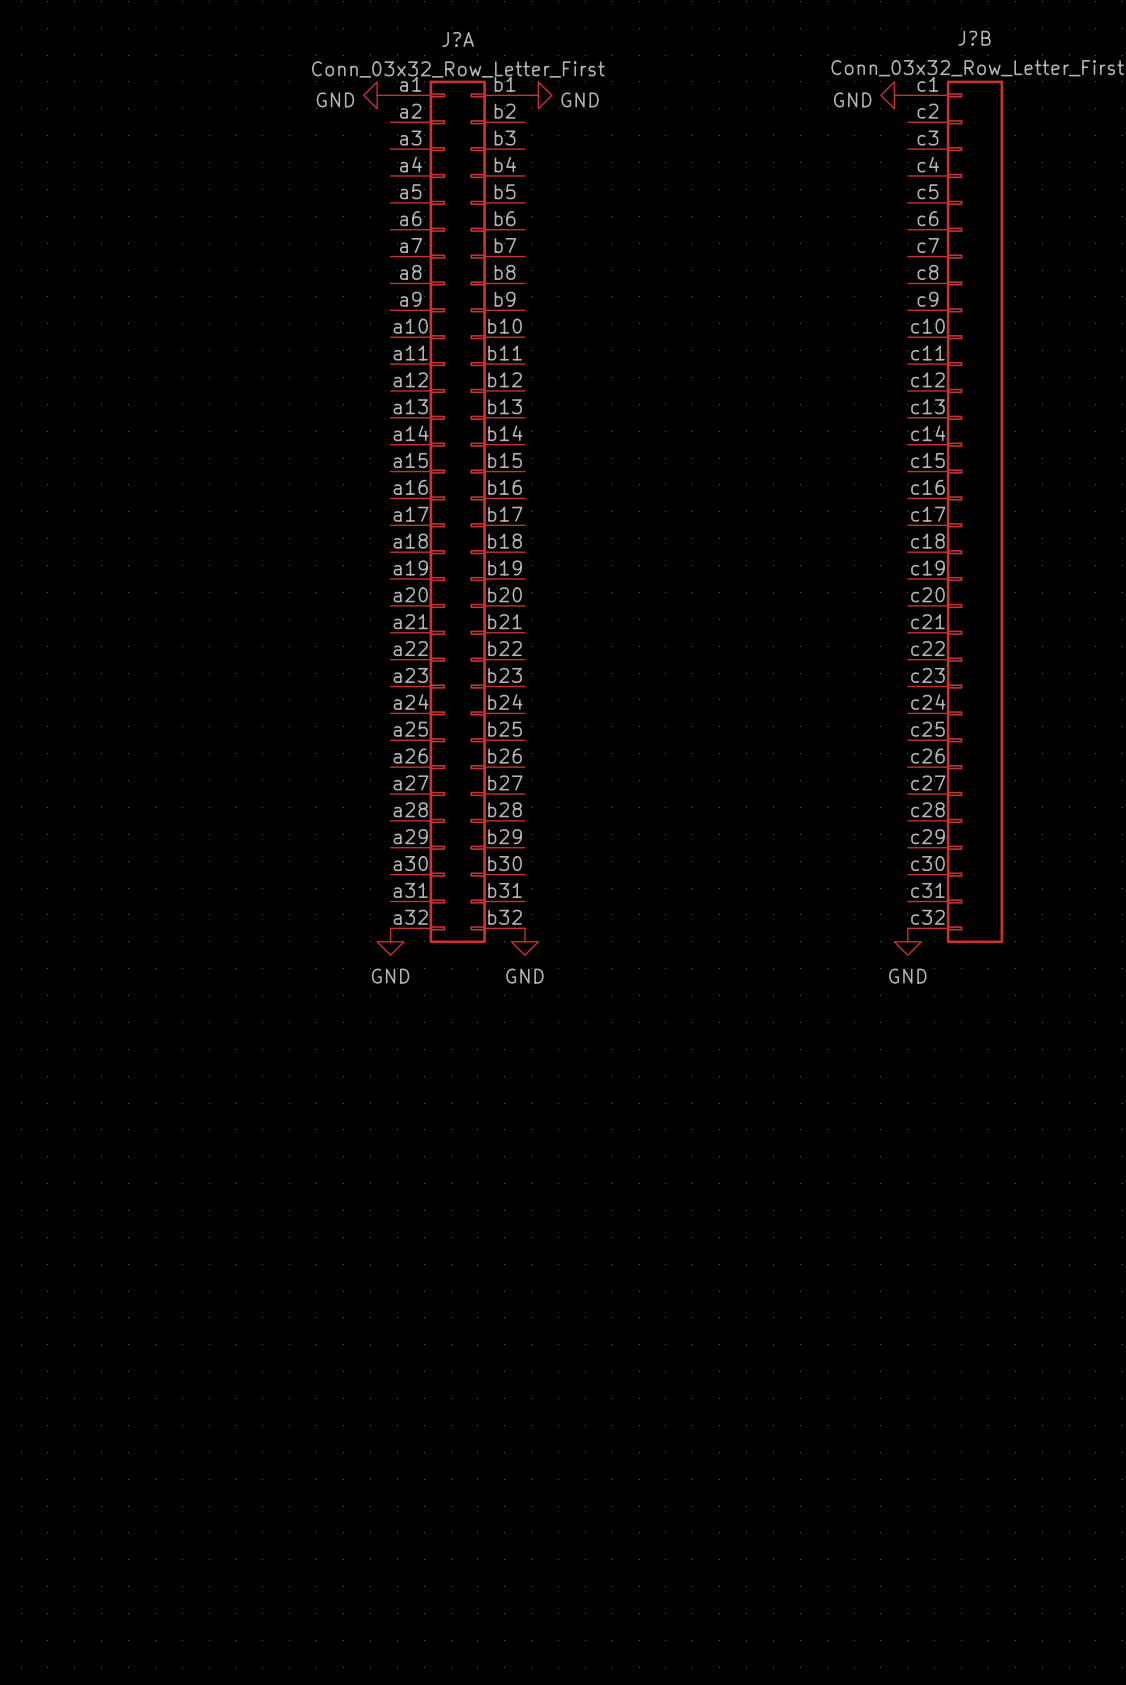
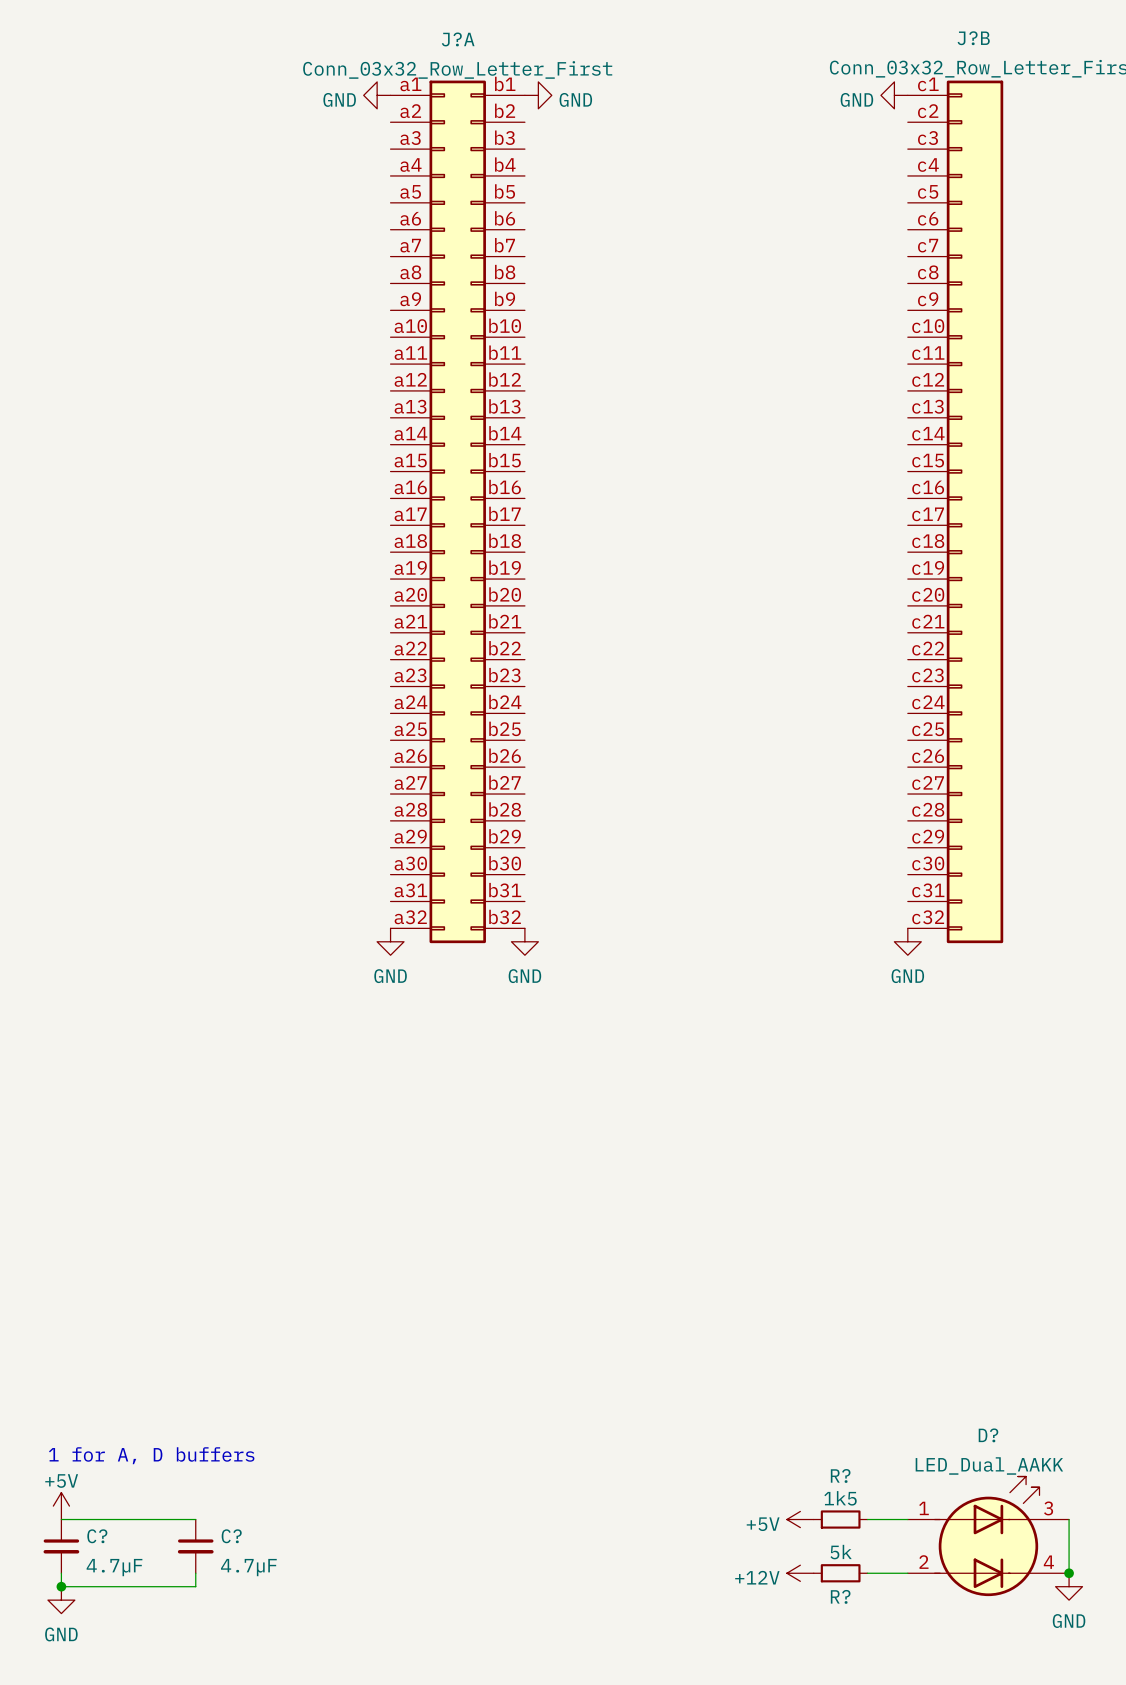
text: none -> 1 for A, D buffers (151, 1455)
power symbol: none -> +5V (61, 1506)
wire: none -> (61, 1519) (195, 1519)
power symbol: none -> +5V (800, 1519)
R?: none -> 1k5 (840, 1519)
wire: none -> (867, 1519) (907, 1519)
wire: none -> (1069, 1519) (1069, 1573)
D?: none -> LED_Dual_AAKK (988, 1536)
C?: none -> 4.7µF (61, 1546)
C?: none -> 4.7µF (195, 1546)
wire: none -> (61, 1573) (61, 1586) (195, 1586) (195, 1573)
power symbol: none -> +12V (800, 1573)
R?: none -> 5k (840, 1573)
wire: none -> (867, 1573) (907, 1573)
junction: none -> (1069, 1573)
junction: none -> (61, 1586)
power symbol: none -> GND (1069, 1586)
power symbol: none -> GND (61, 1600)

